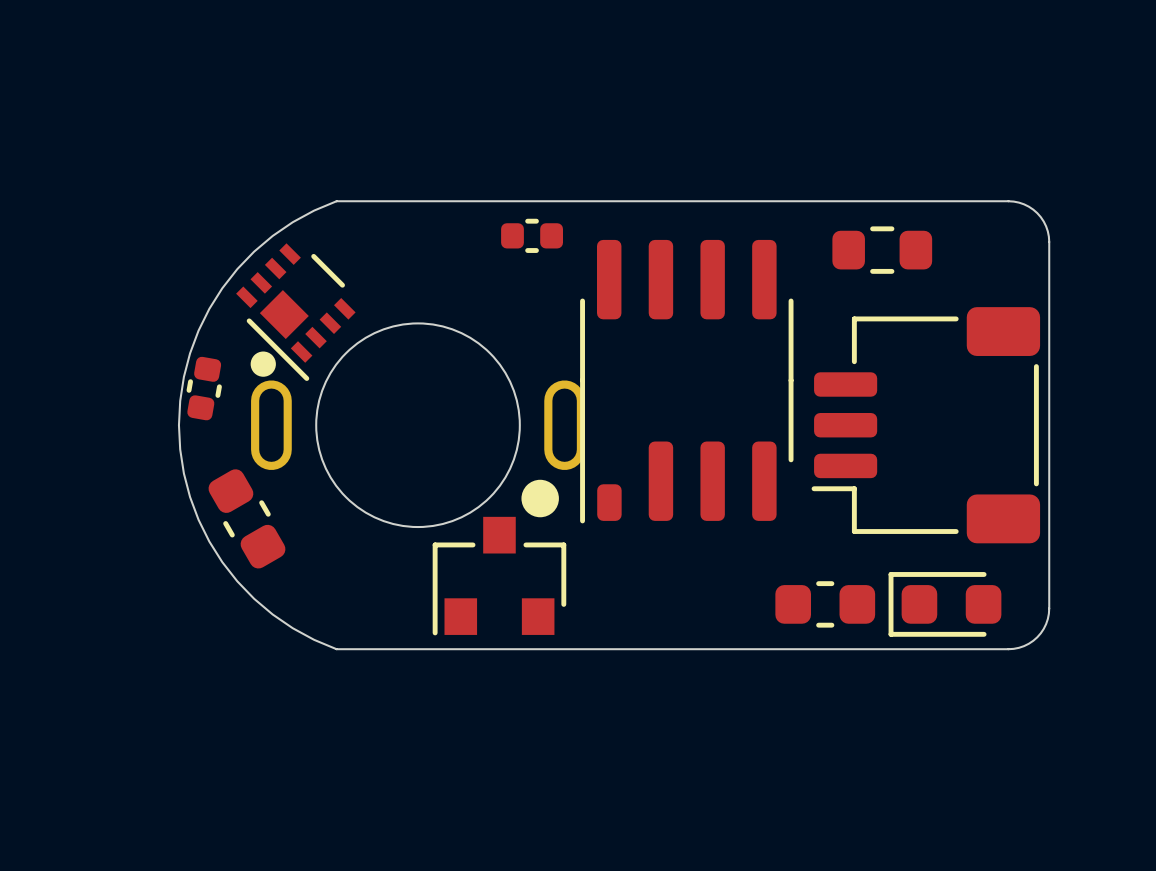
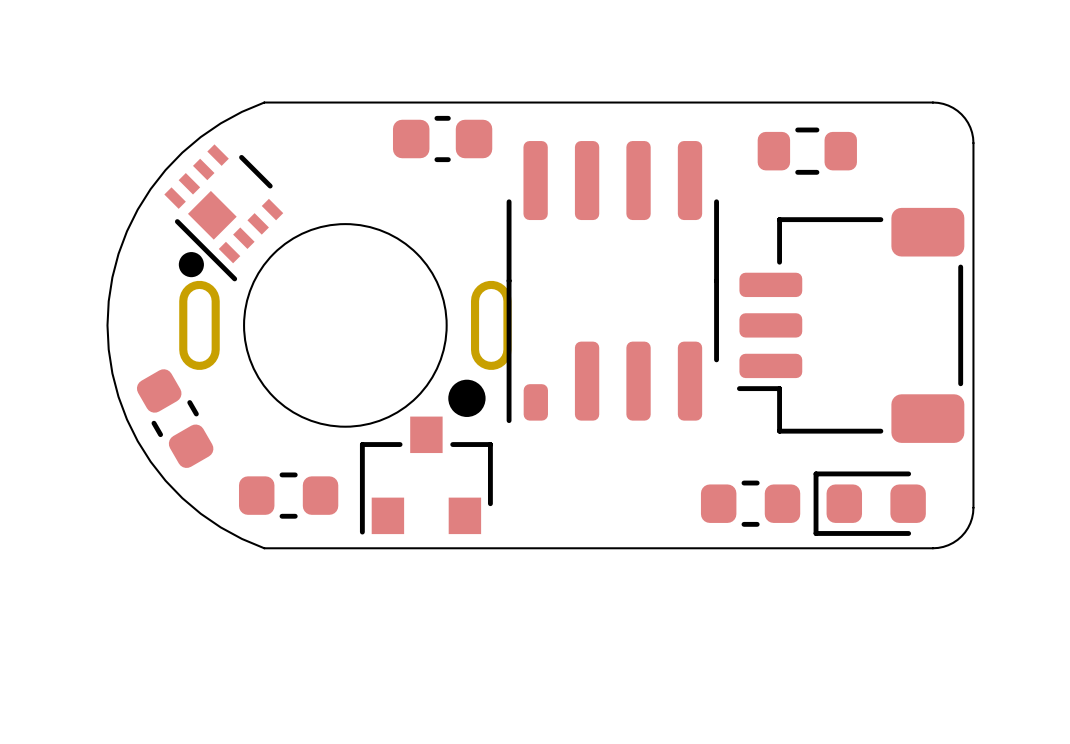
part footprint: [501, 218, 564, 253] -> [392, 115, 493, 163]
part: (204, 388) -> none
part: none -> (288, 495)

